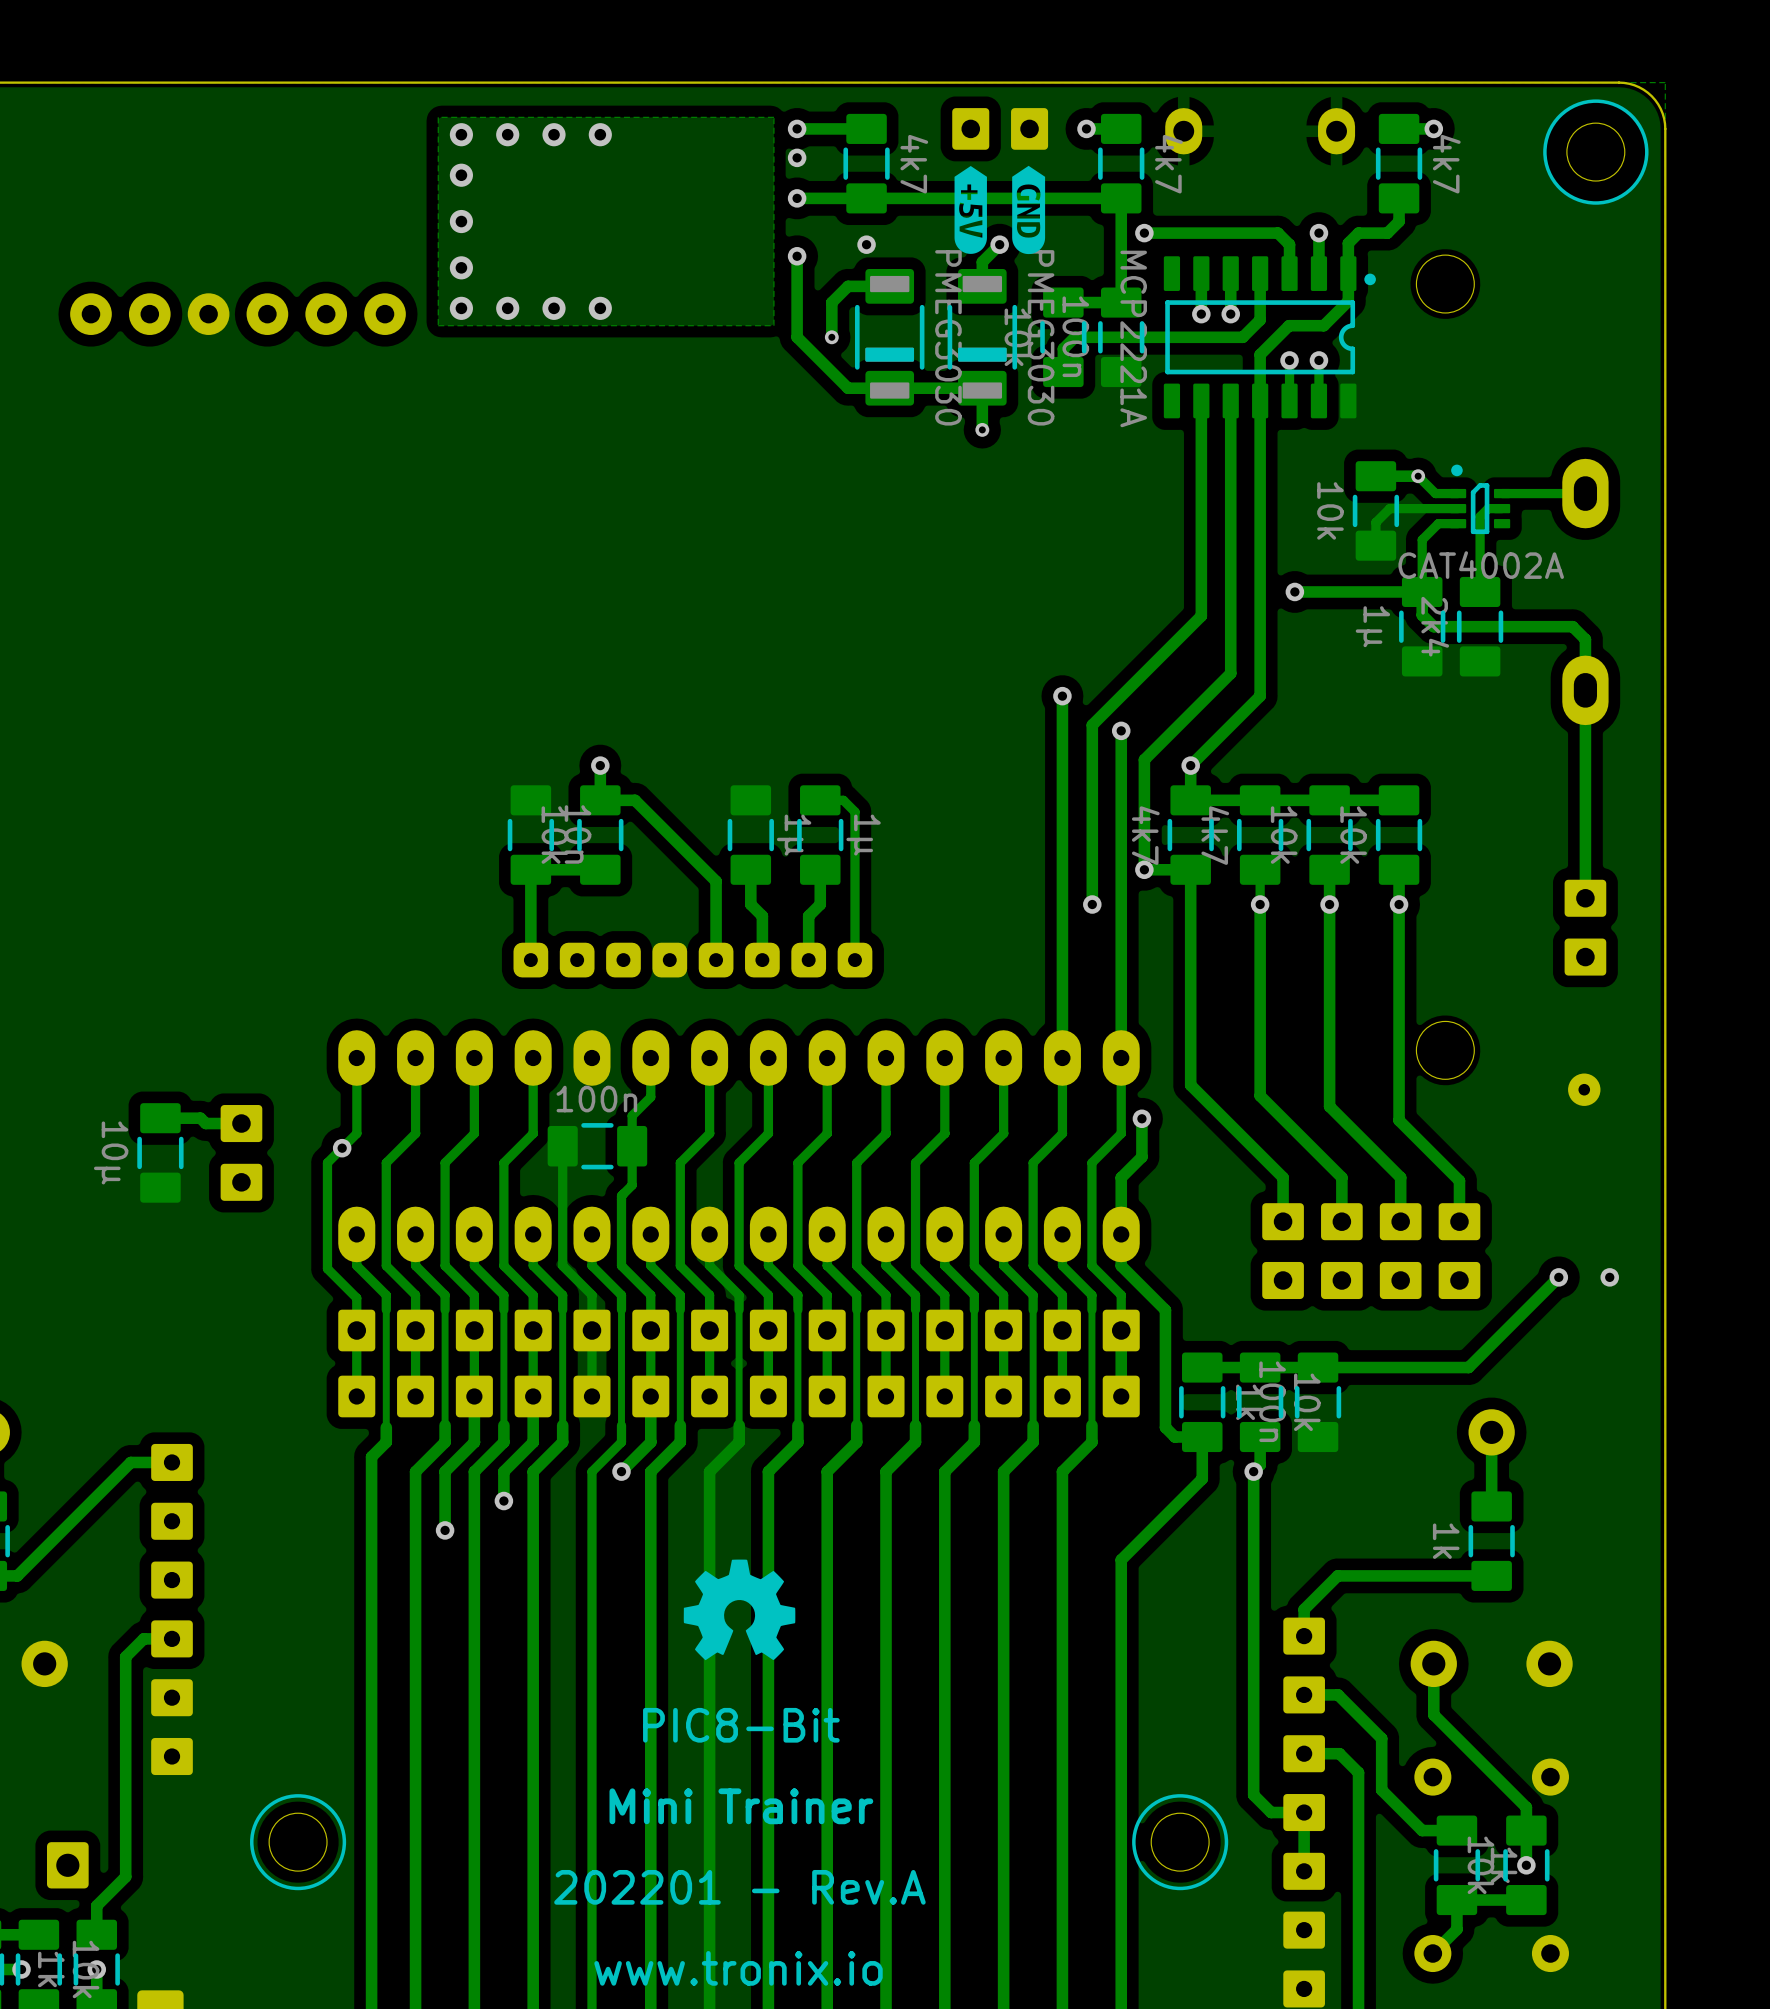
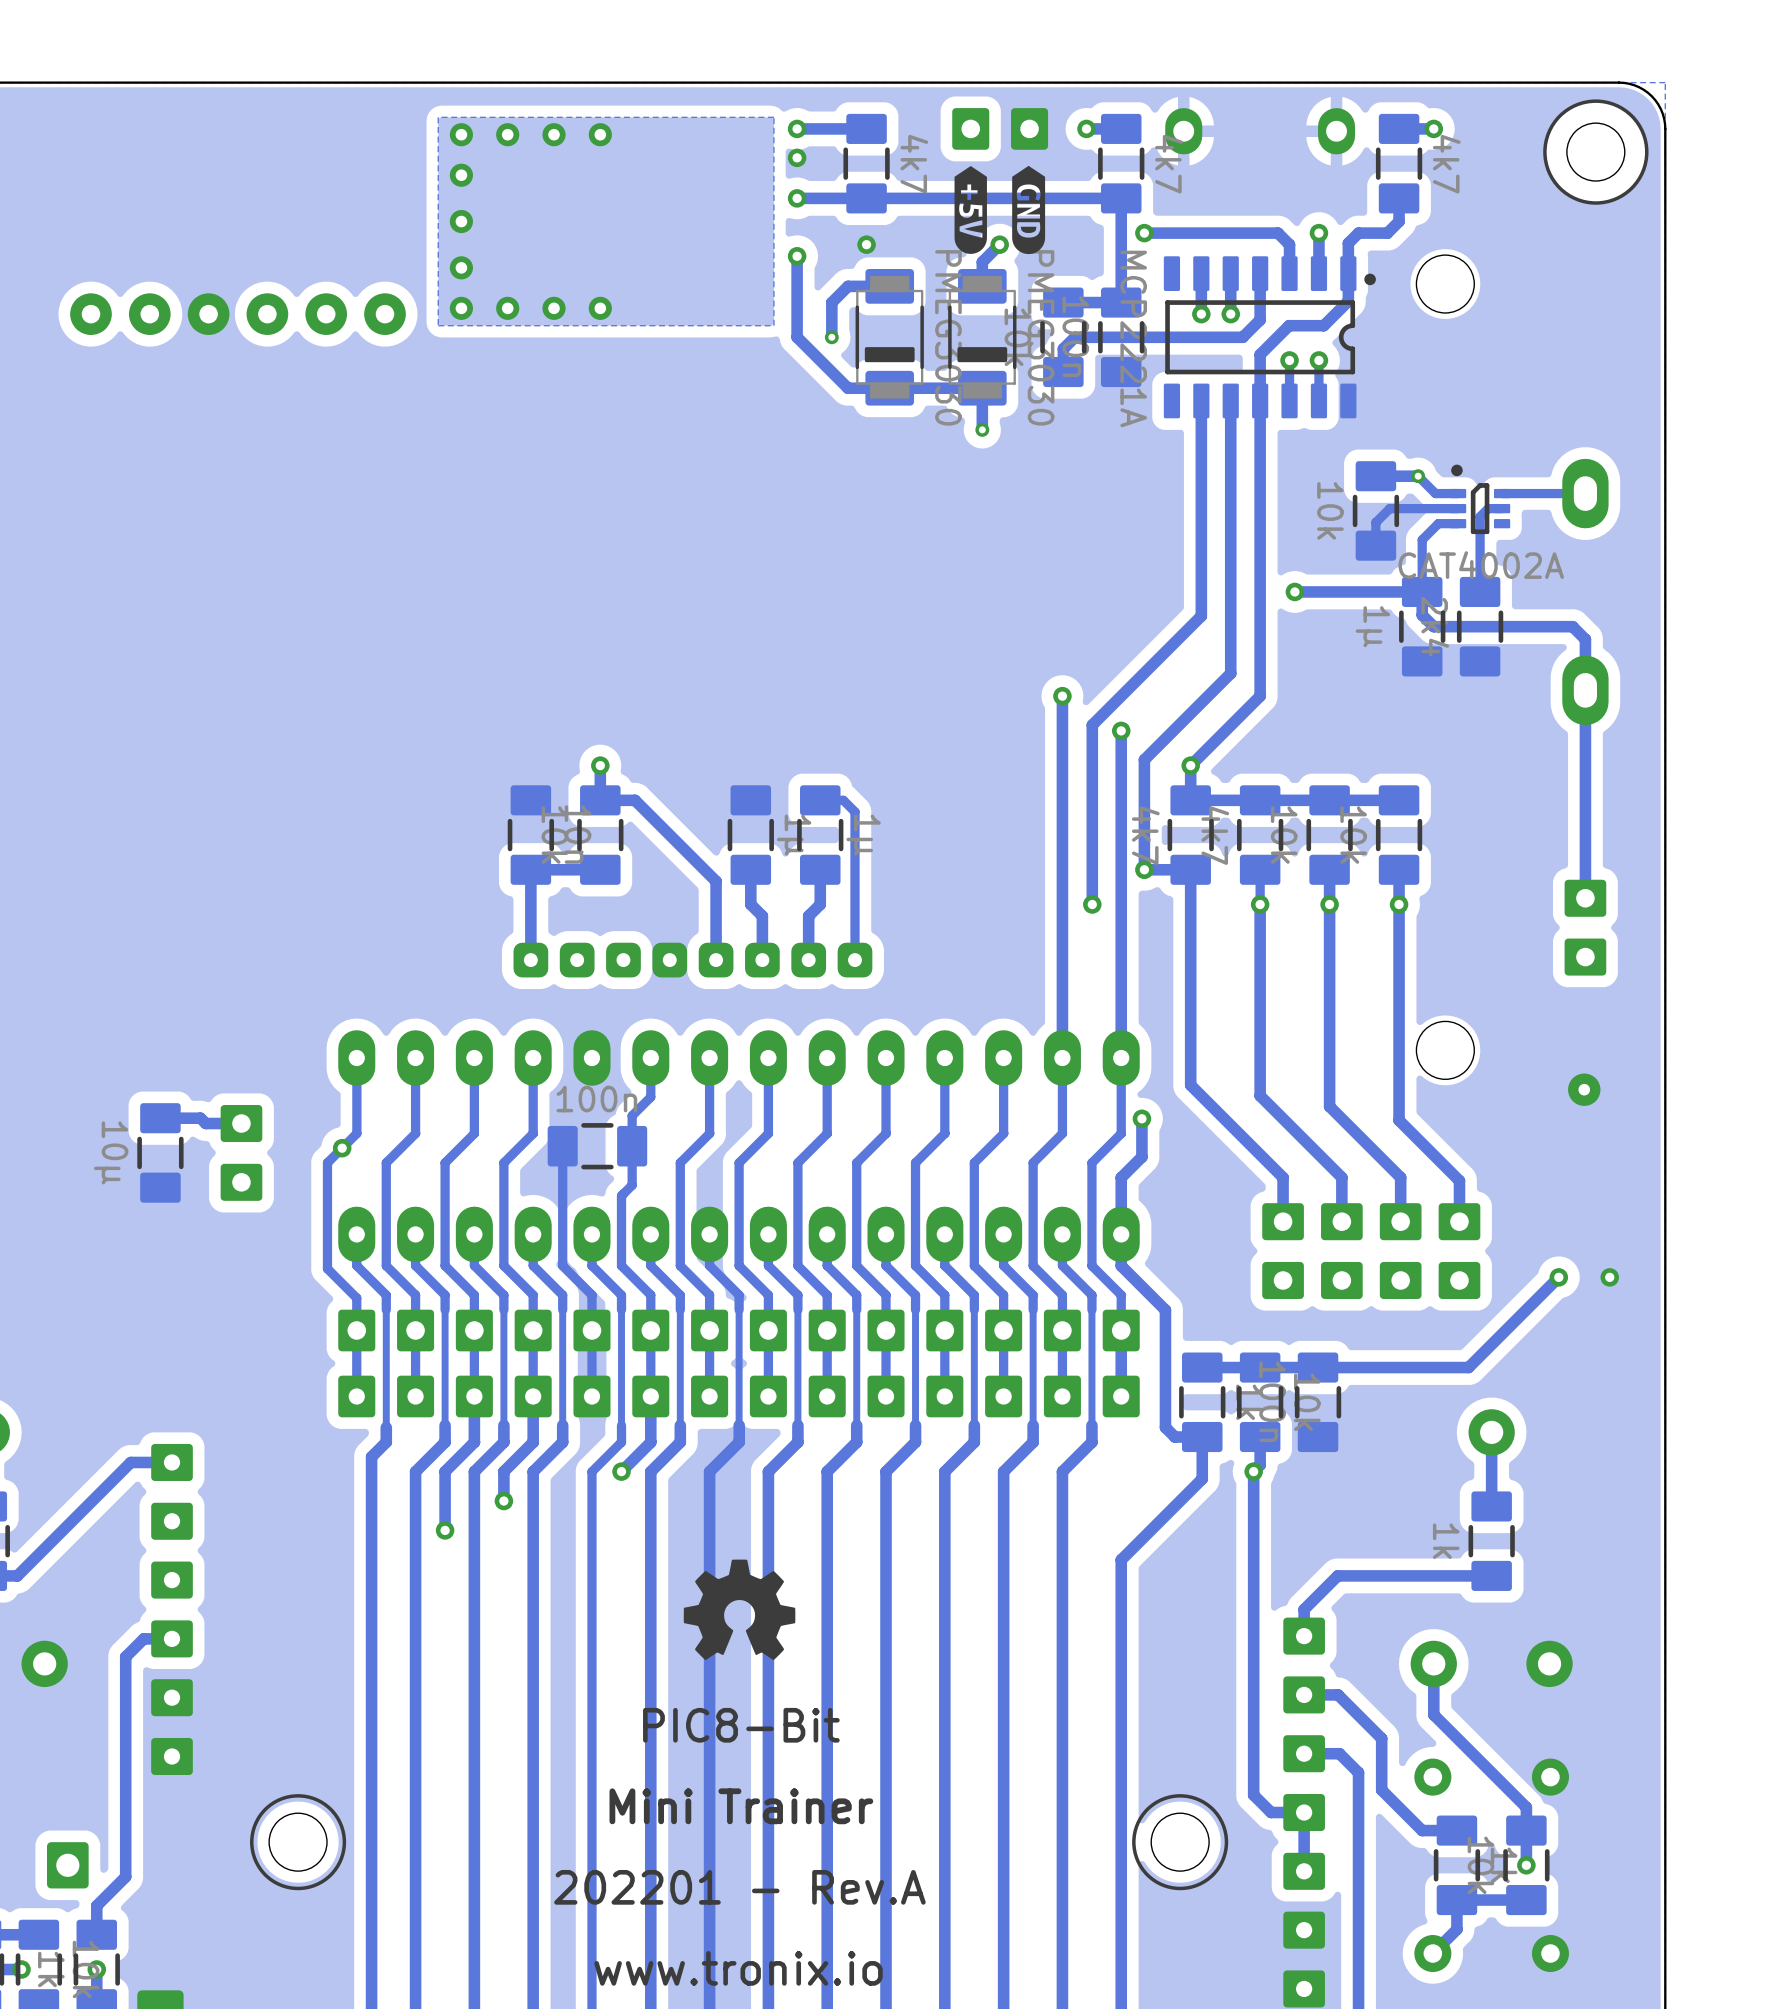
part footprint: [854, 268, 925, 406] -> [855, 268, 924, 406]
part footprint: [947, 268, 1018, 406] -> [948, 268, 1017, 406]

